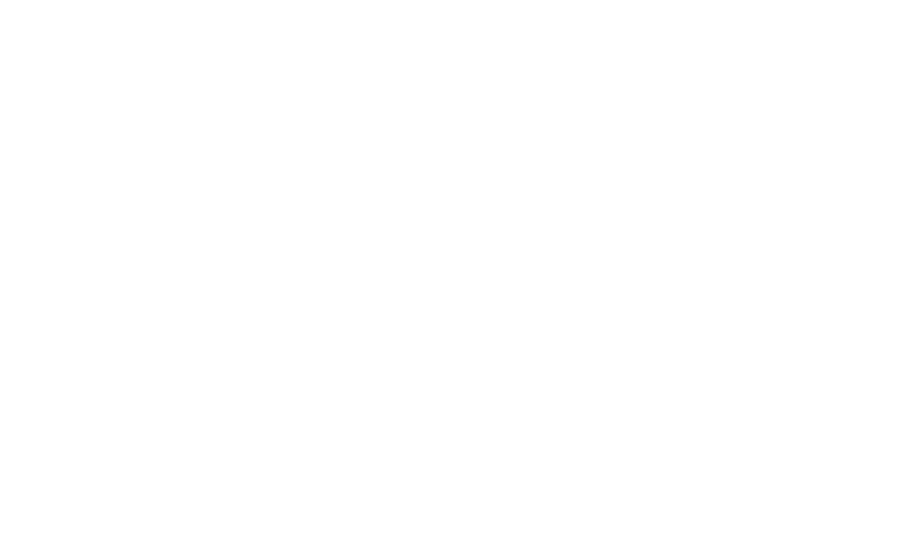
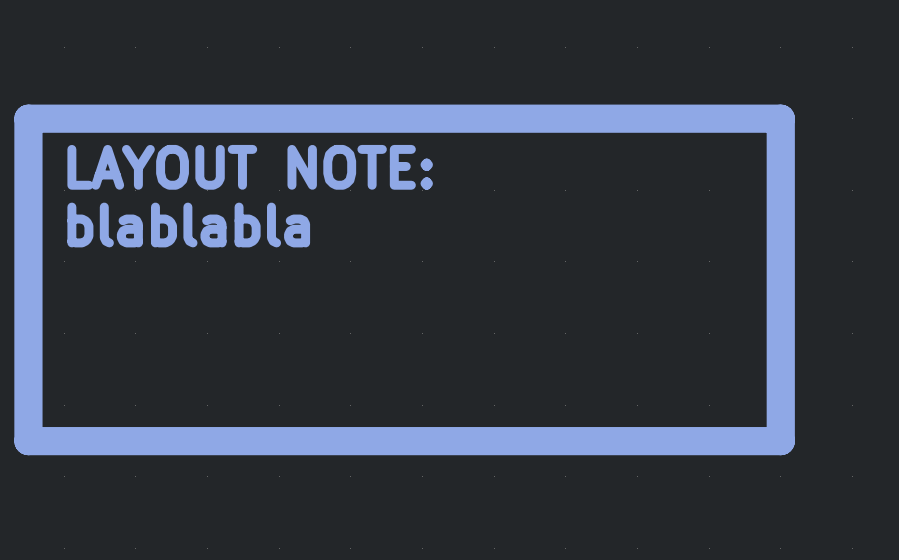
line: none -> (28, 118) (780, 118) (780, 441) (28, 441) (28, 118)
text: none -> LAYOUT NOTE: (250, 167)
text: none -> blablabla (188, 225)

